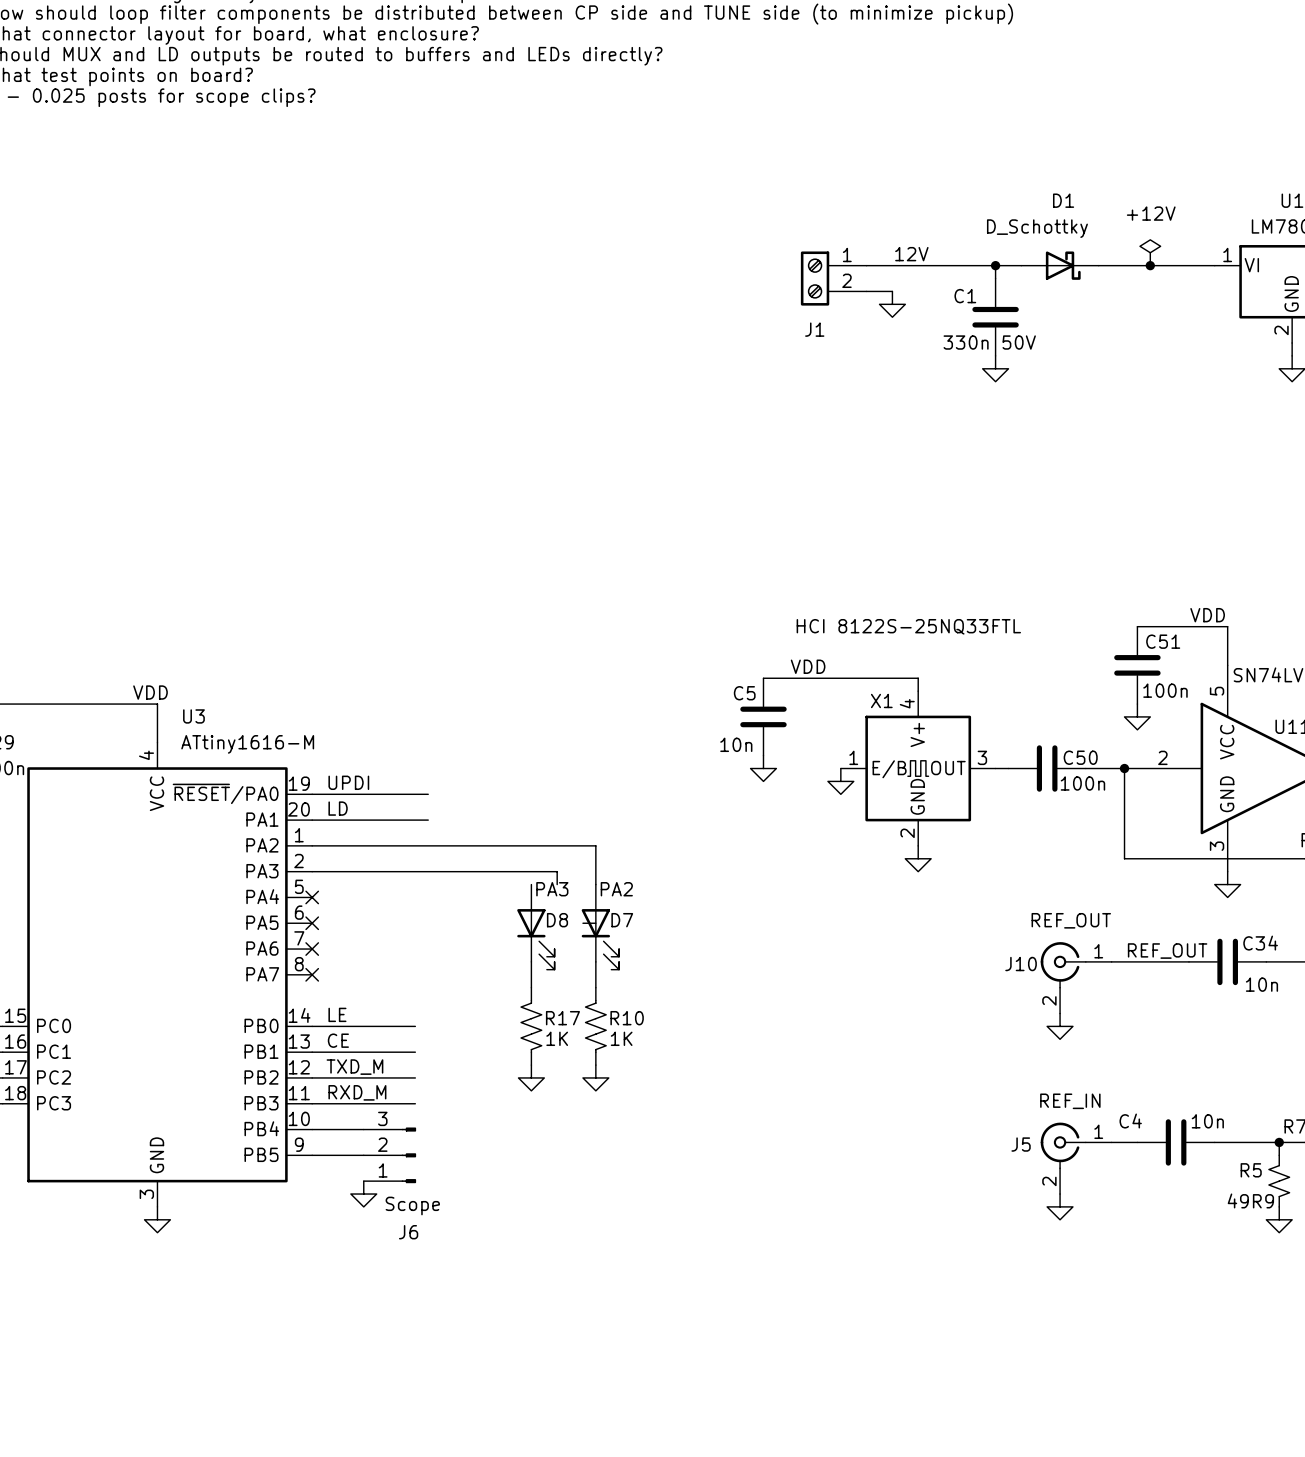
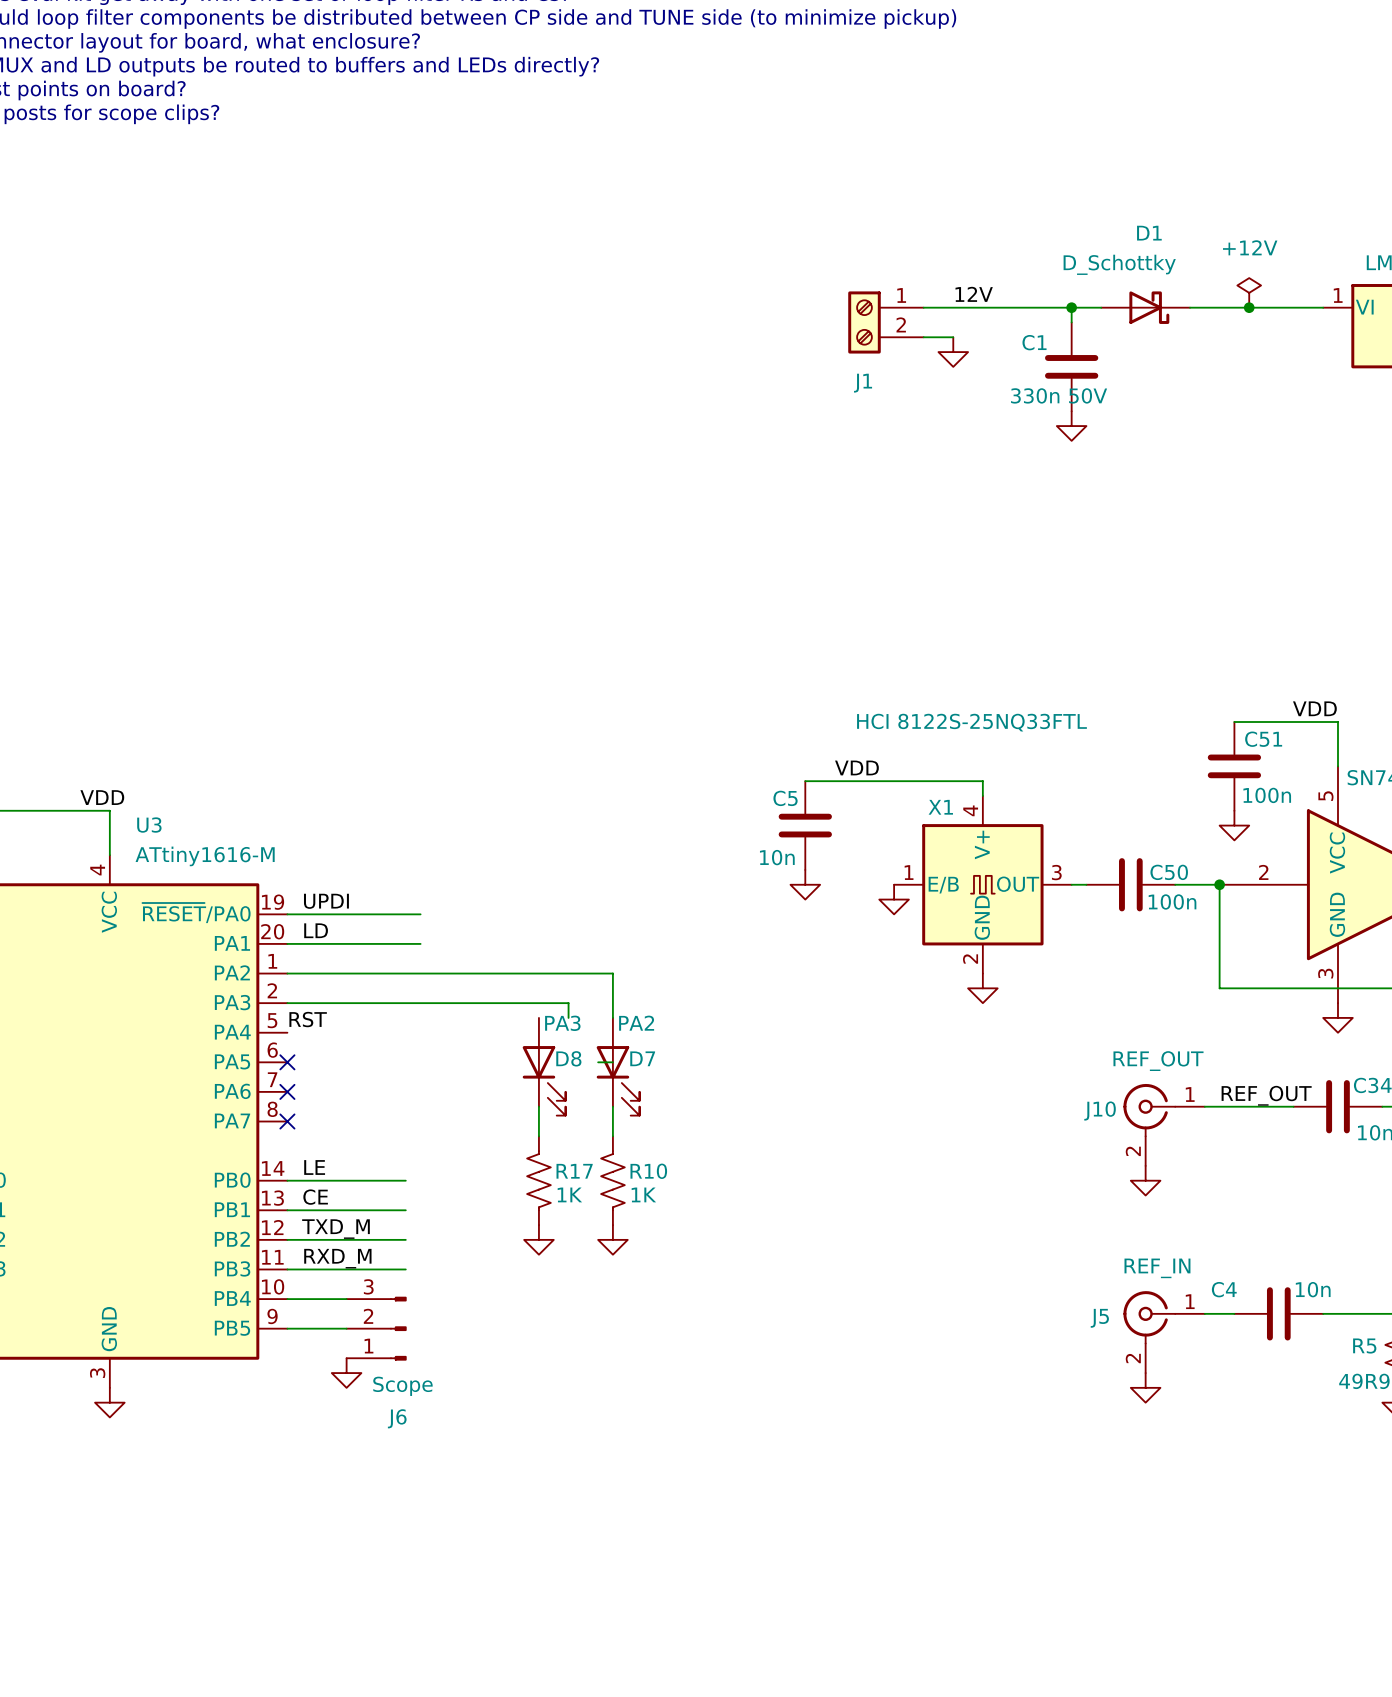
label: none -> RST (308, 1019)
no-connect mark: (312, 897) -> none

